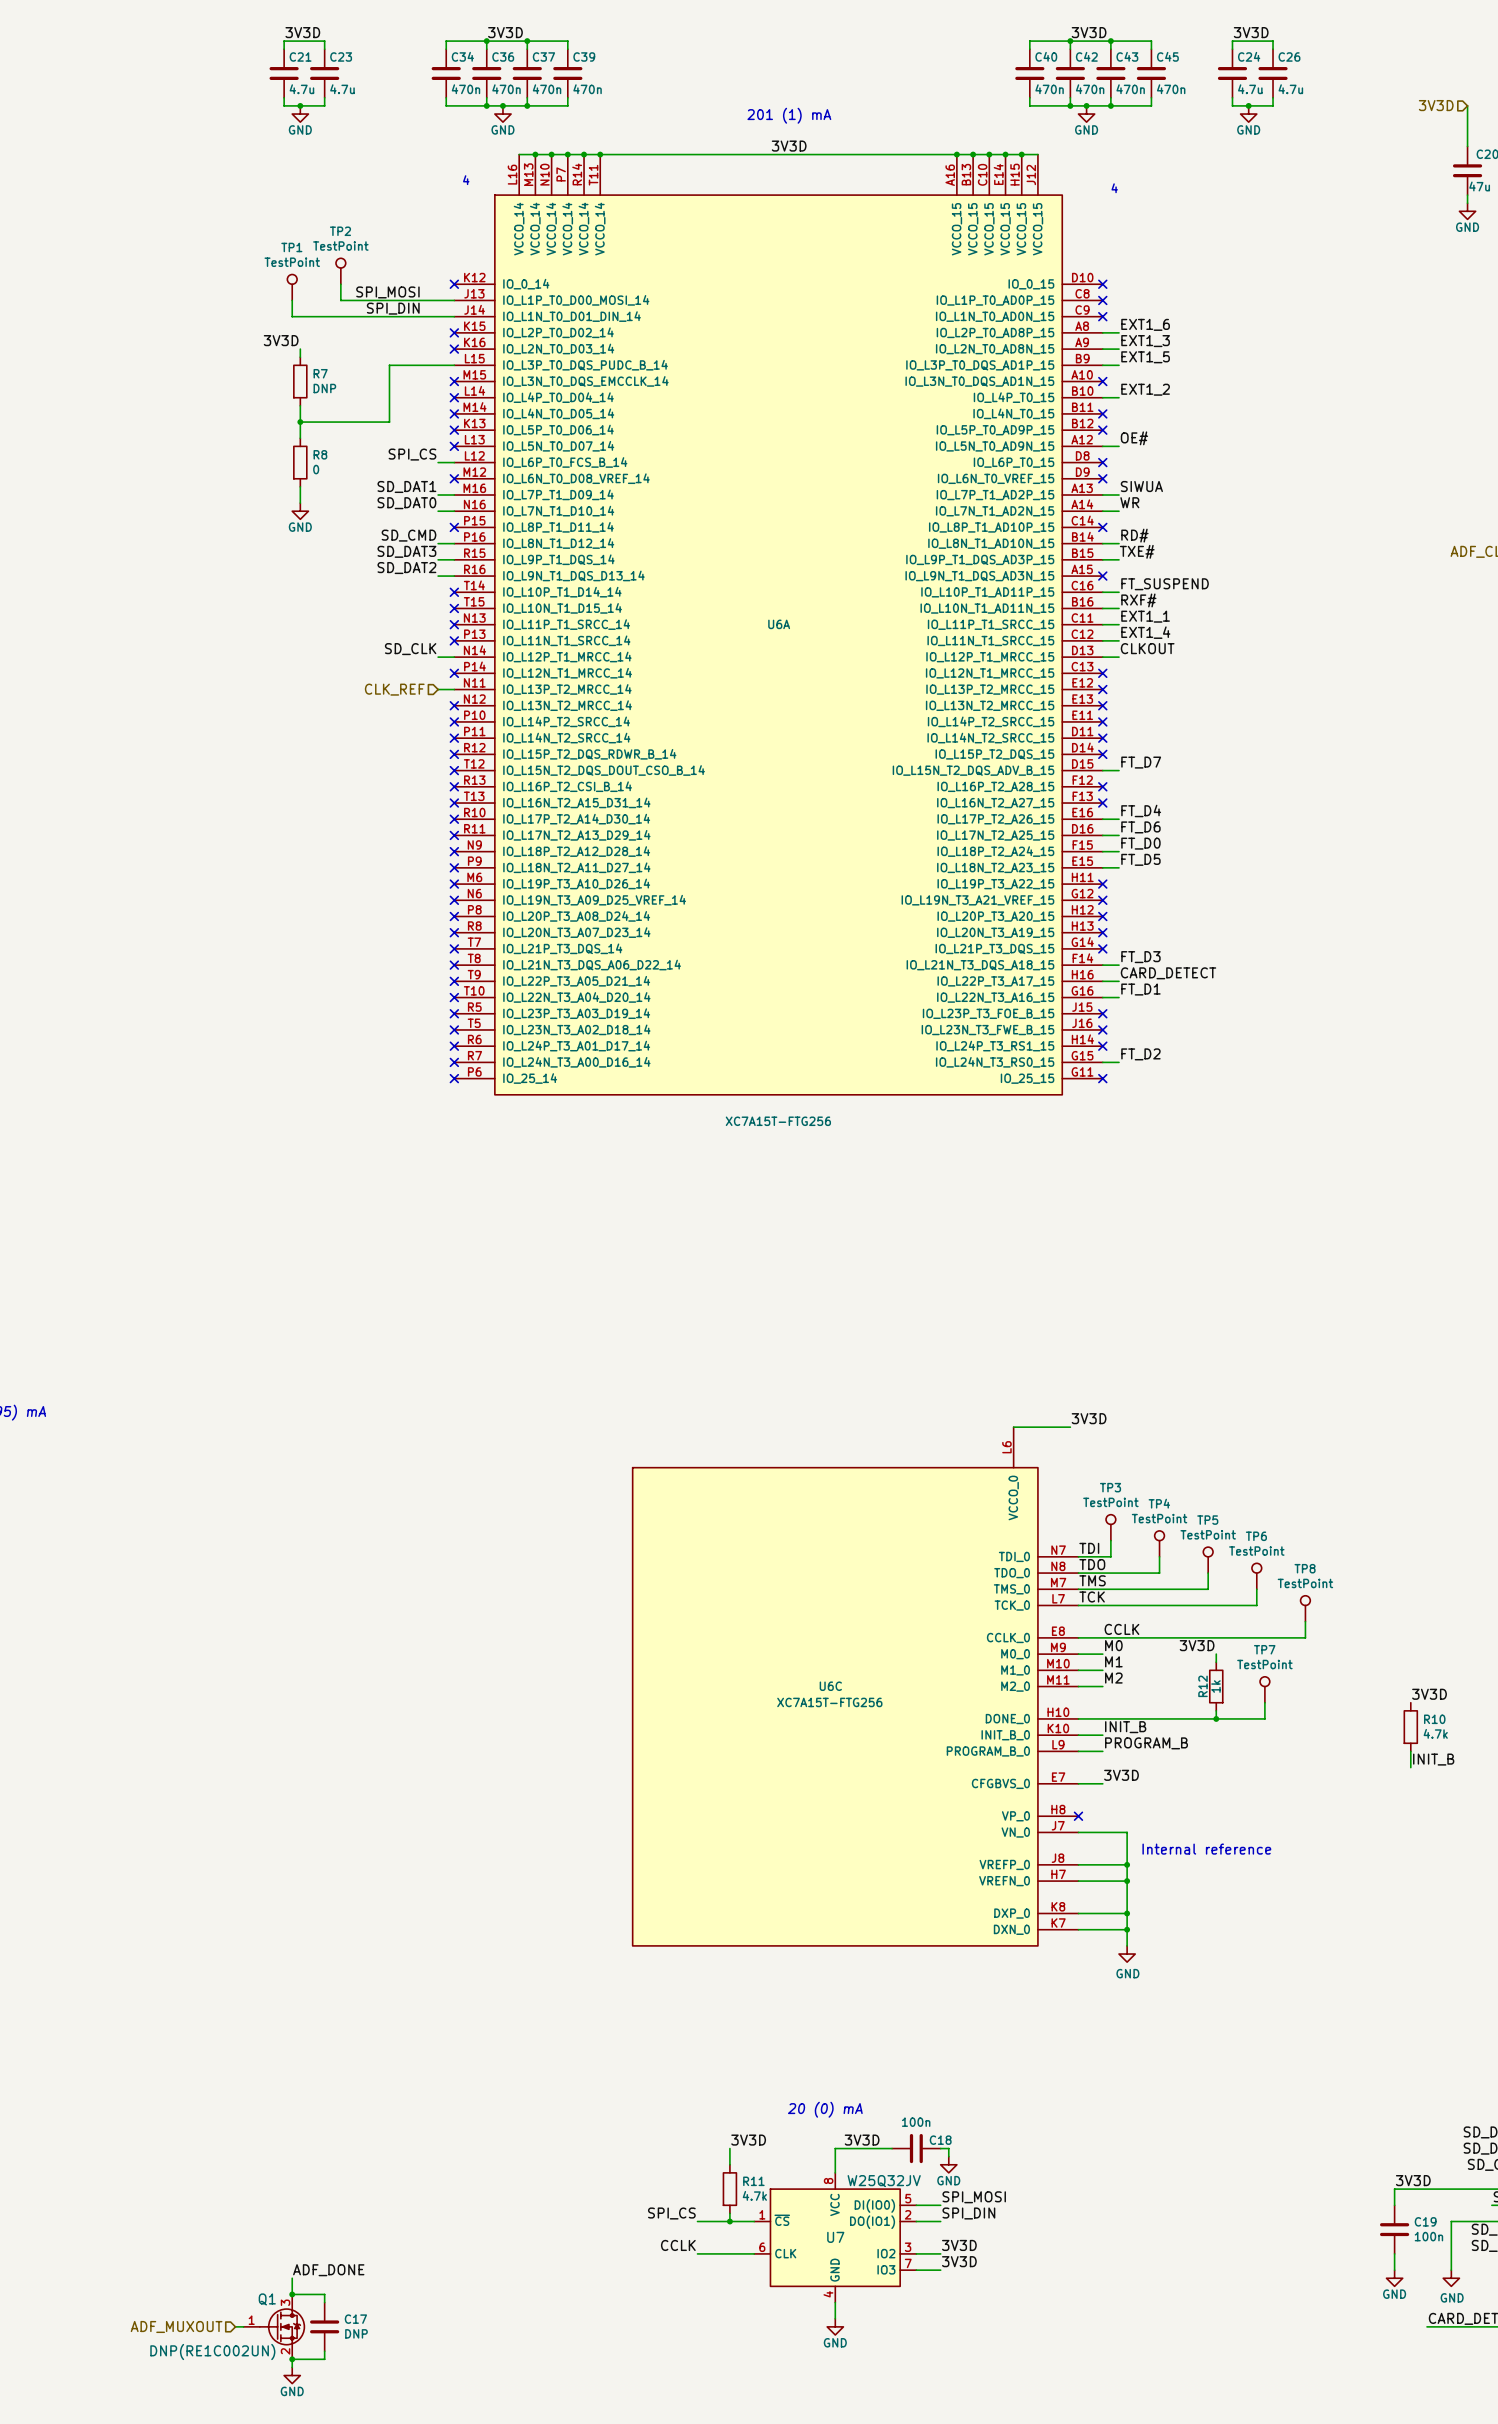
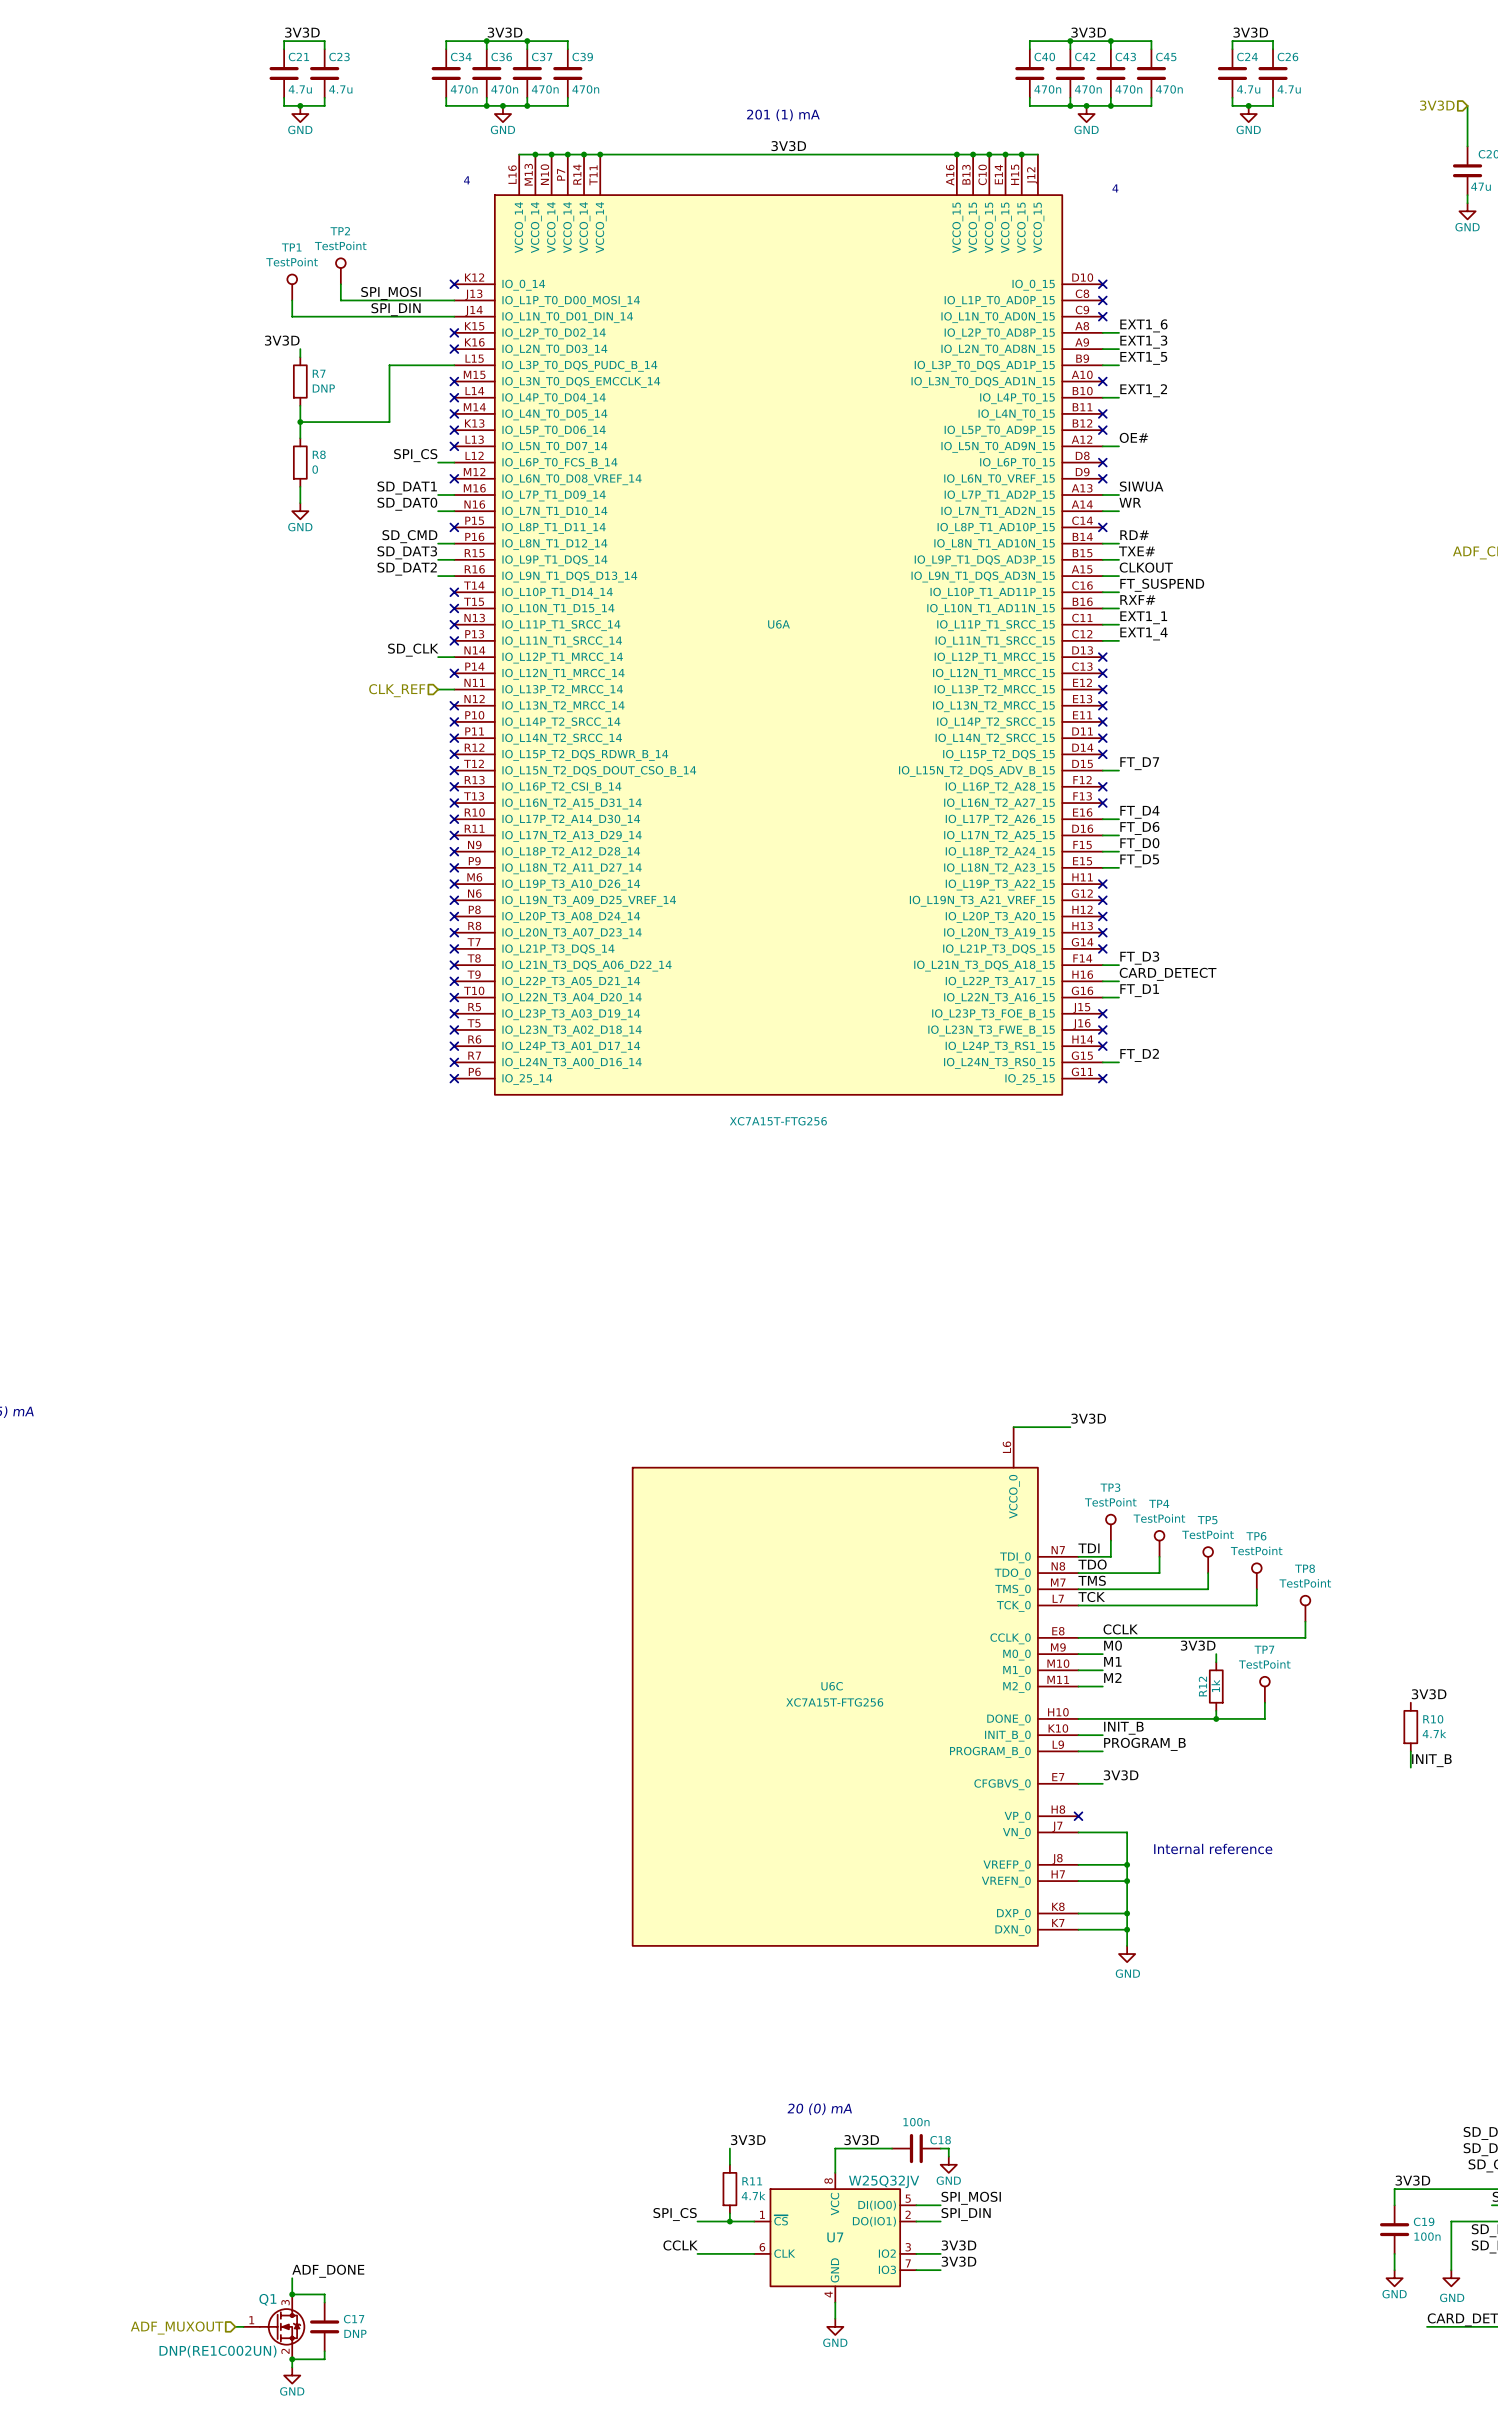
no-connect mark: (1102, 576) -> none
label position: CLKOUT (1147, 648) -> CLKOUT (1146, 567)
wire: (1102, 657) (1119, 657) -> (1102, 576) (1119, 576)
no-connect mark: none -> (1102, 657)

